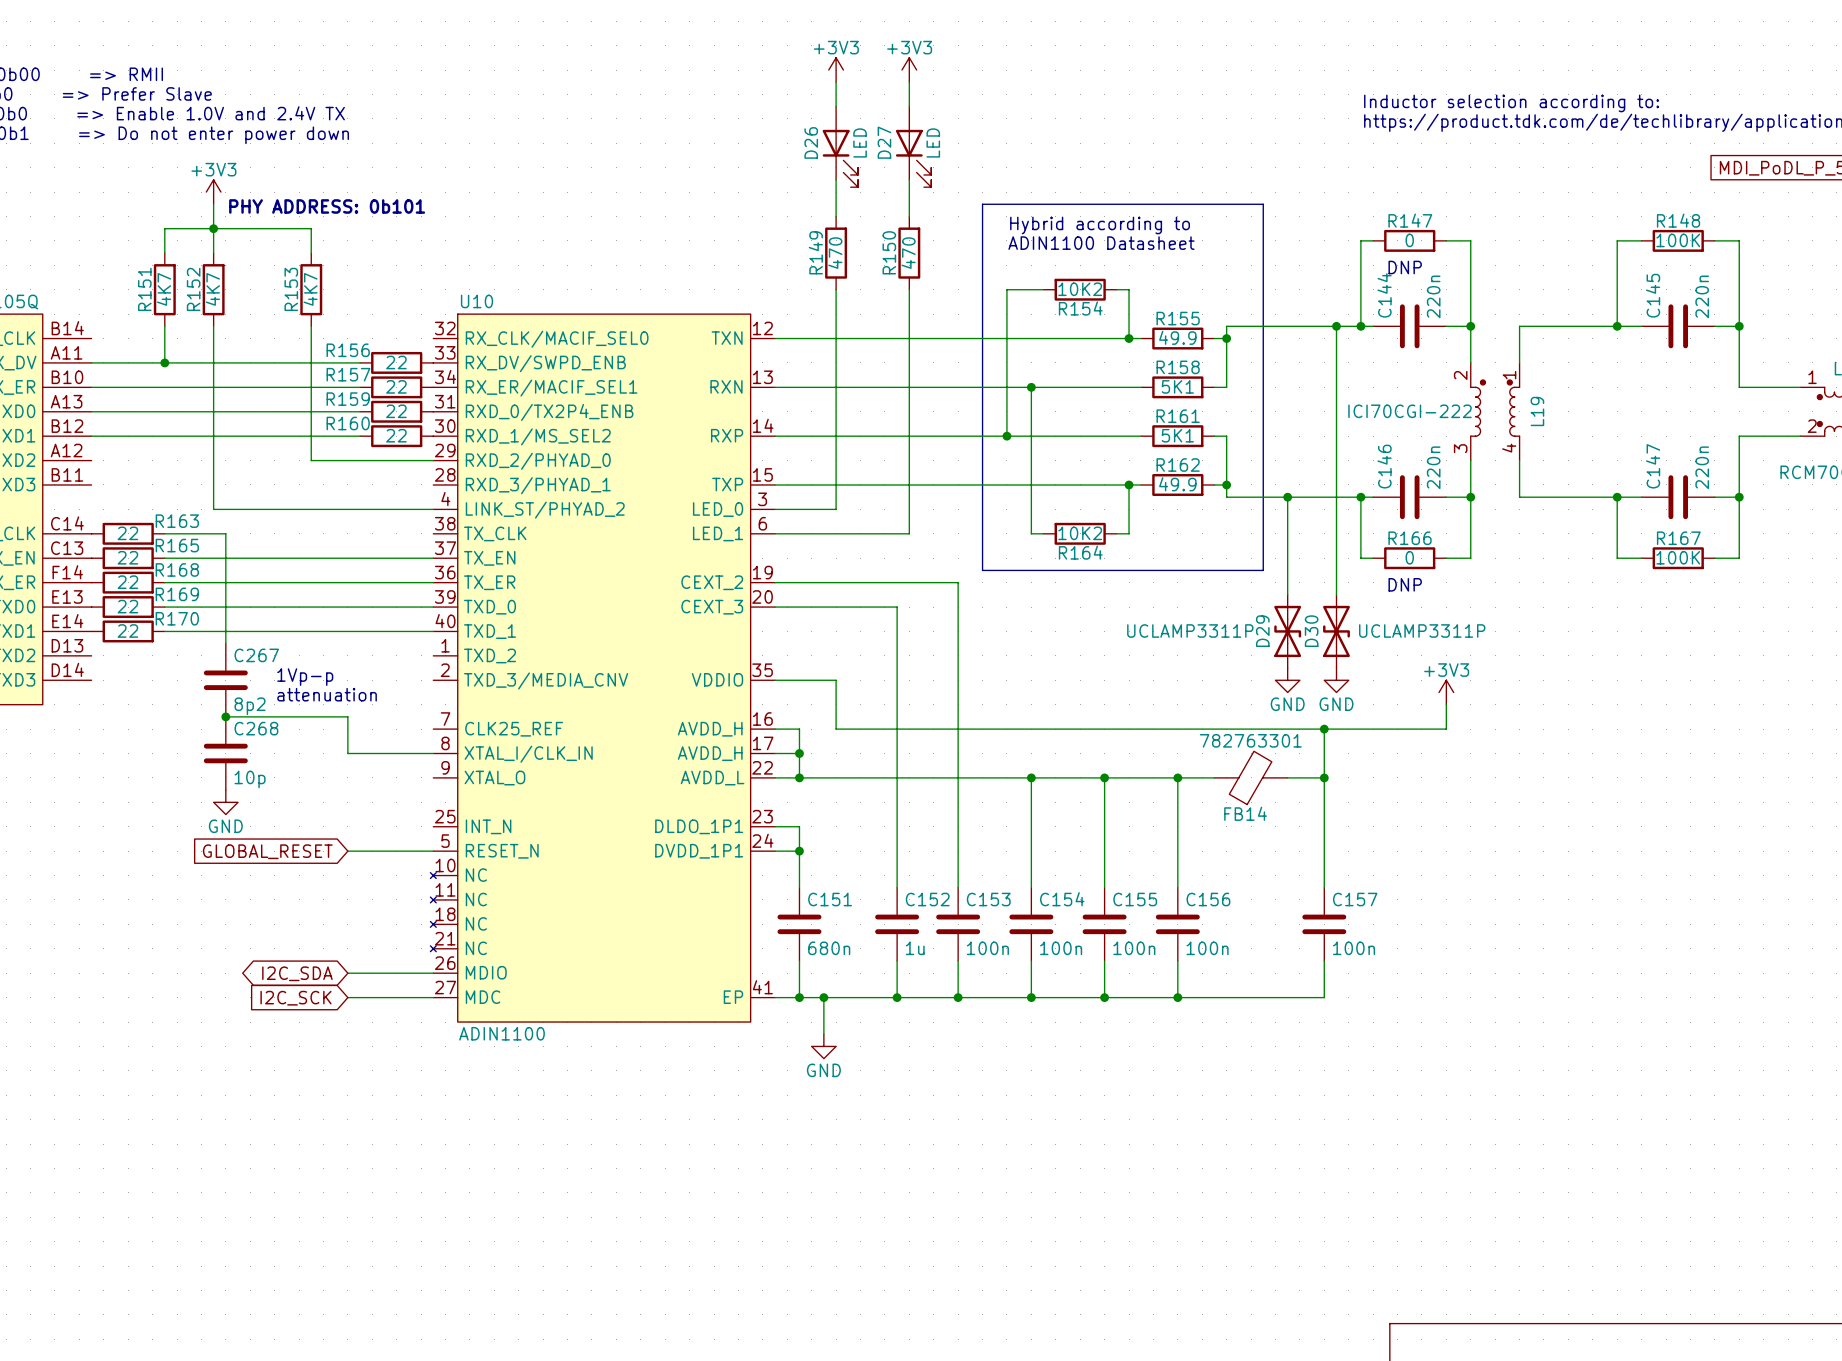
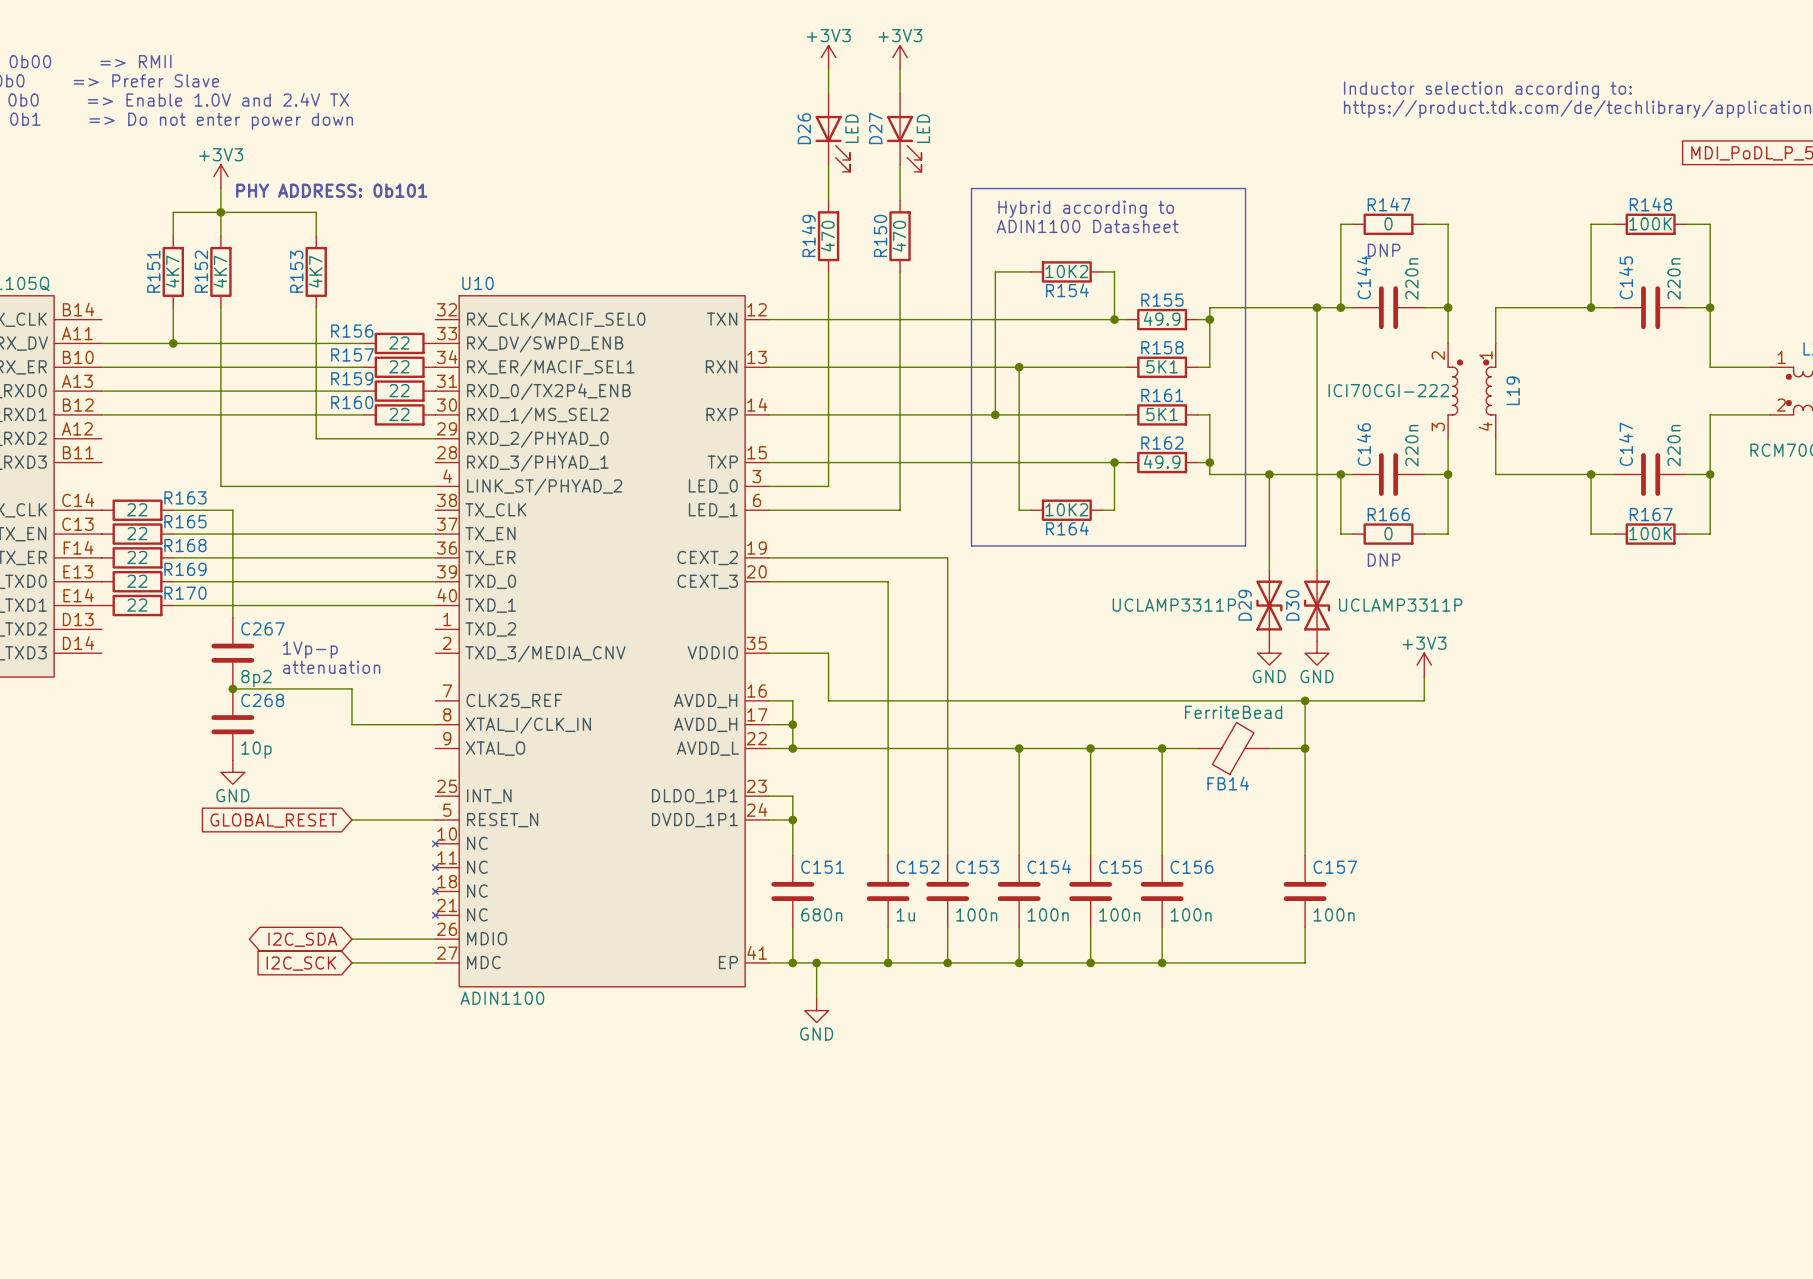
FB14 value: 782763301 (1250, 740) -> FerriteBead (1233, 712)

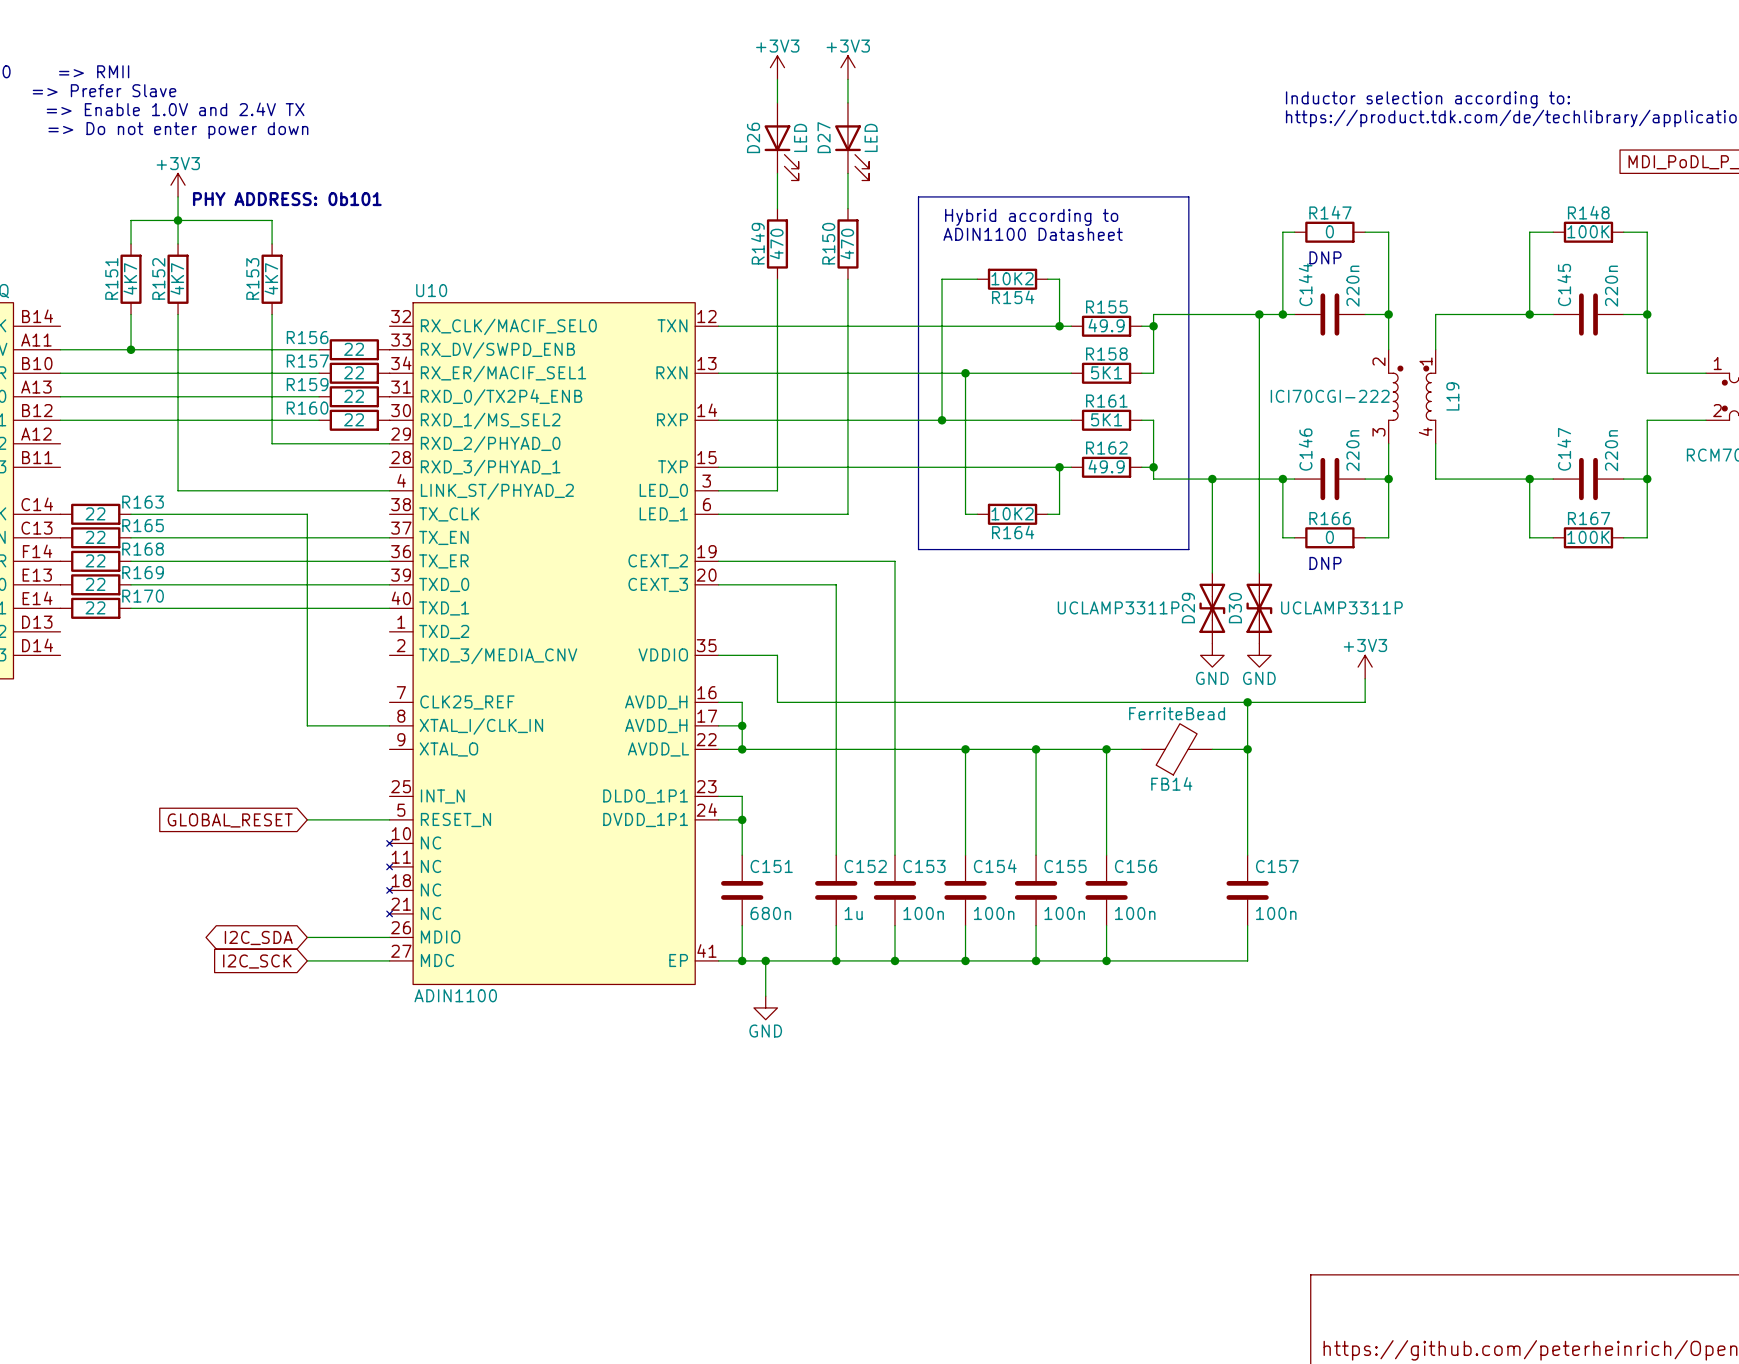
wire: (232, 510) (232, 617) -> (189, 514) (307, 514) (307, 690)
text: 1Vp-p (310, 650) -> none
C267: 8p2 (232, 653) -> none
text: attenuation (331, 667) -> none
wire: (232, 688) (351, 688) -> none
junction: (232, 688) -> none
C268: 10p (232, 724) -> none
power symbol: GND (232, 772) -> none

